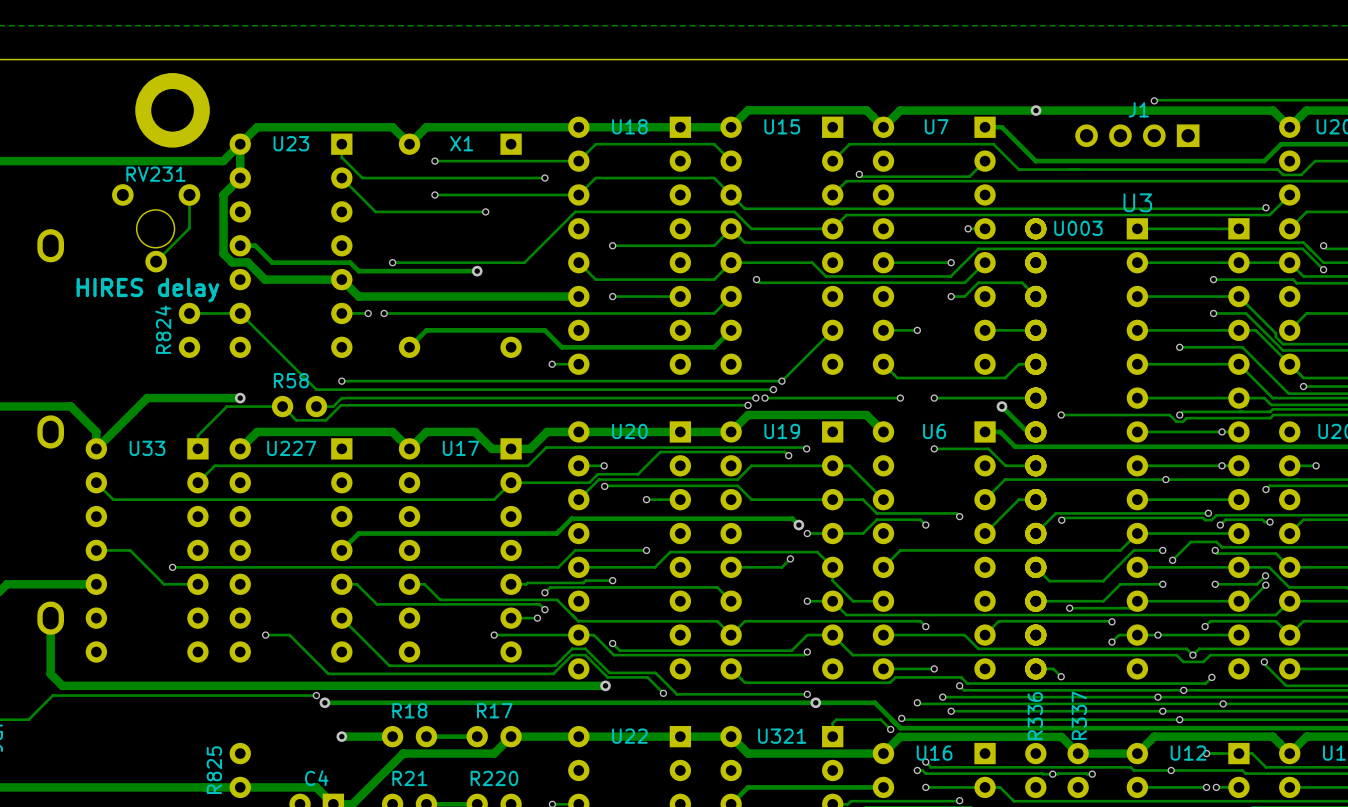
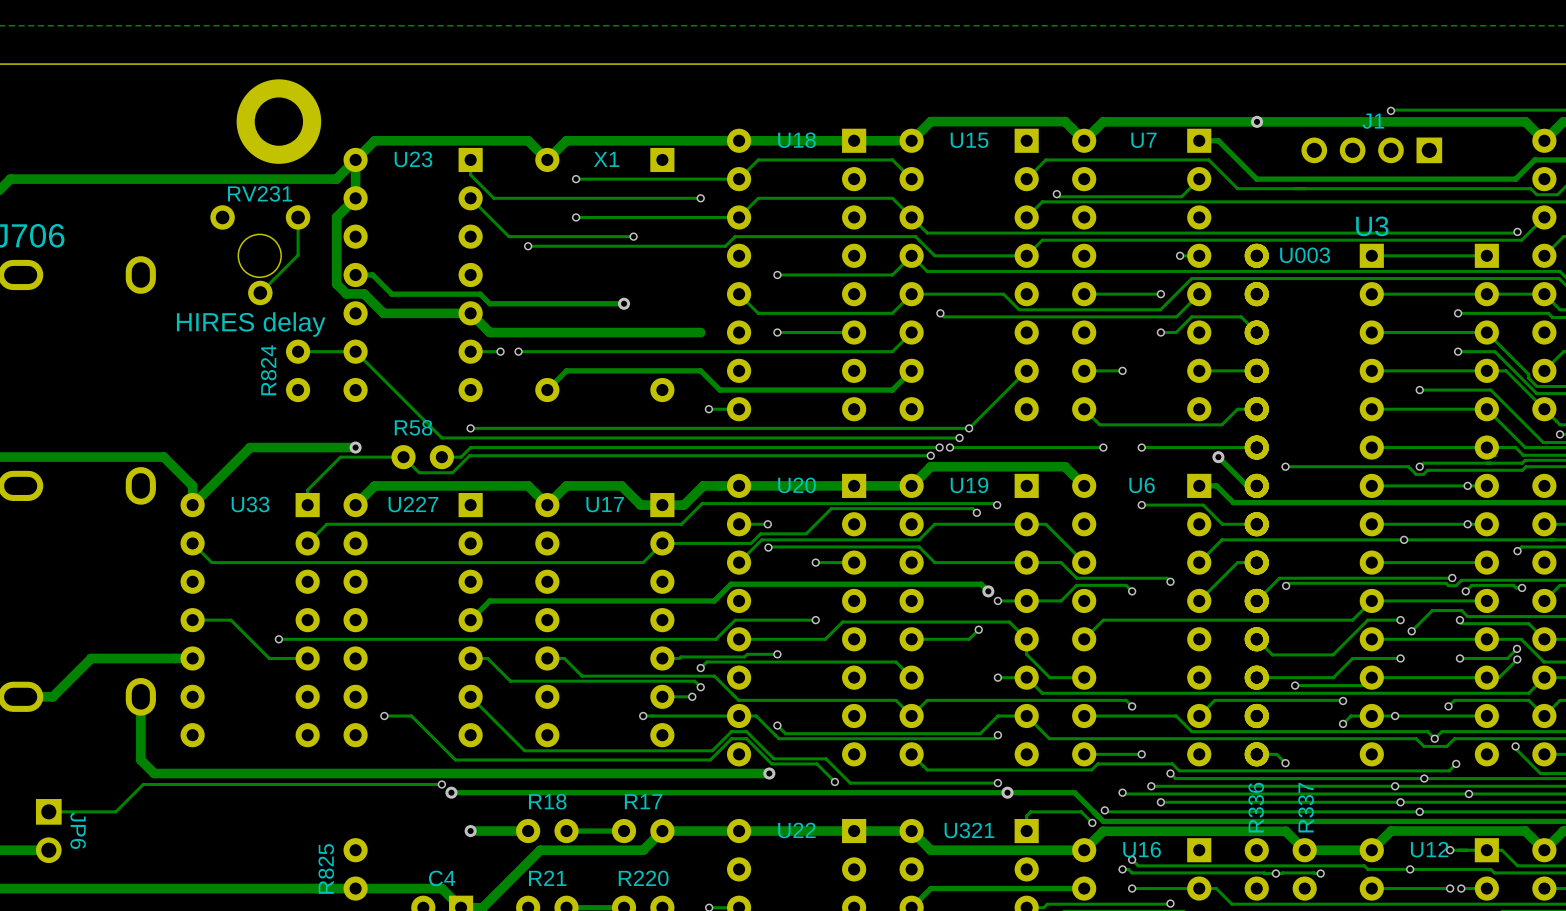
track: (566, 220) (524, 262) (392, 262) -> (725, 246) (528, 246)
via position: (392, 262) -> (528, 246)
track: (578, 296) (544, 296) -> none

